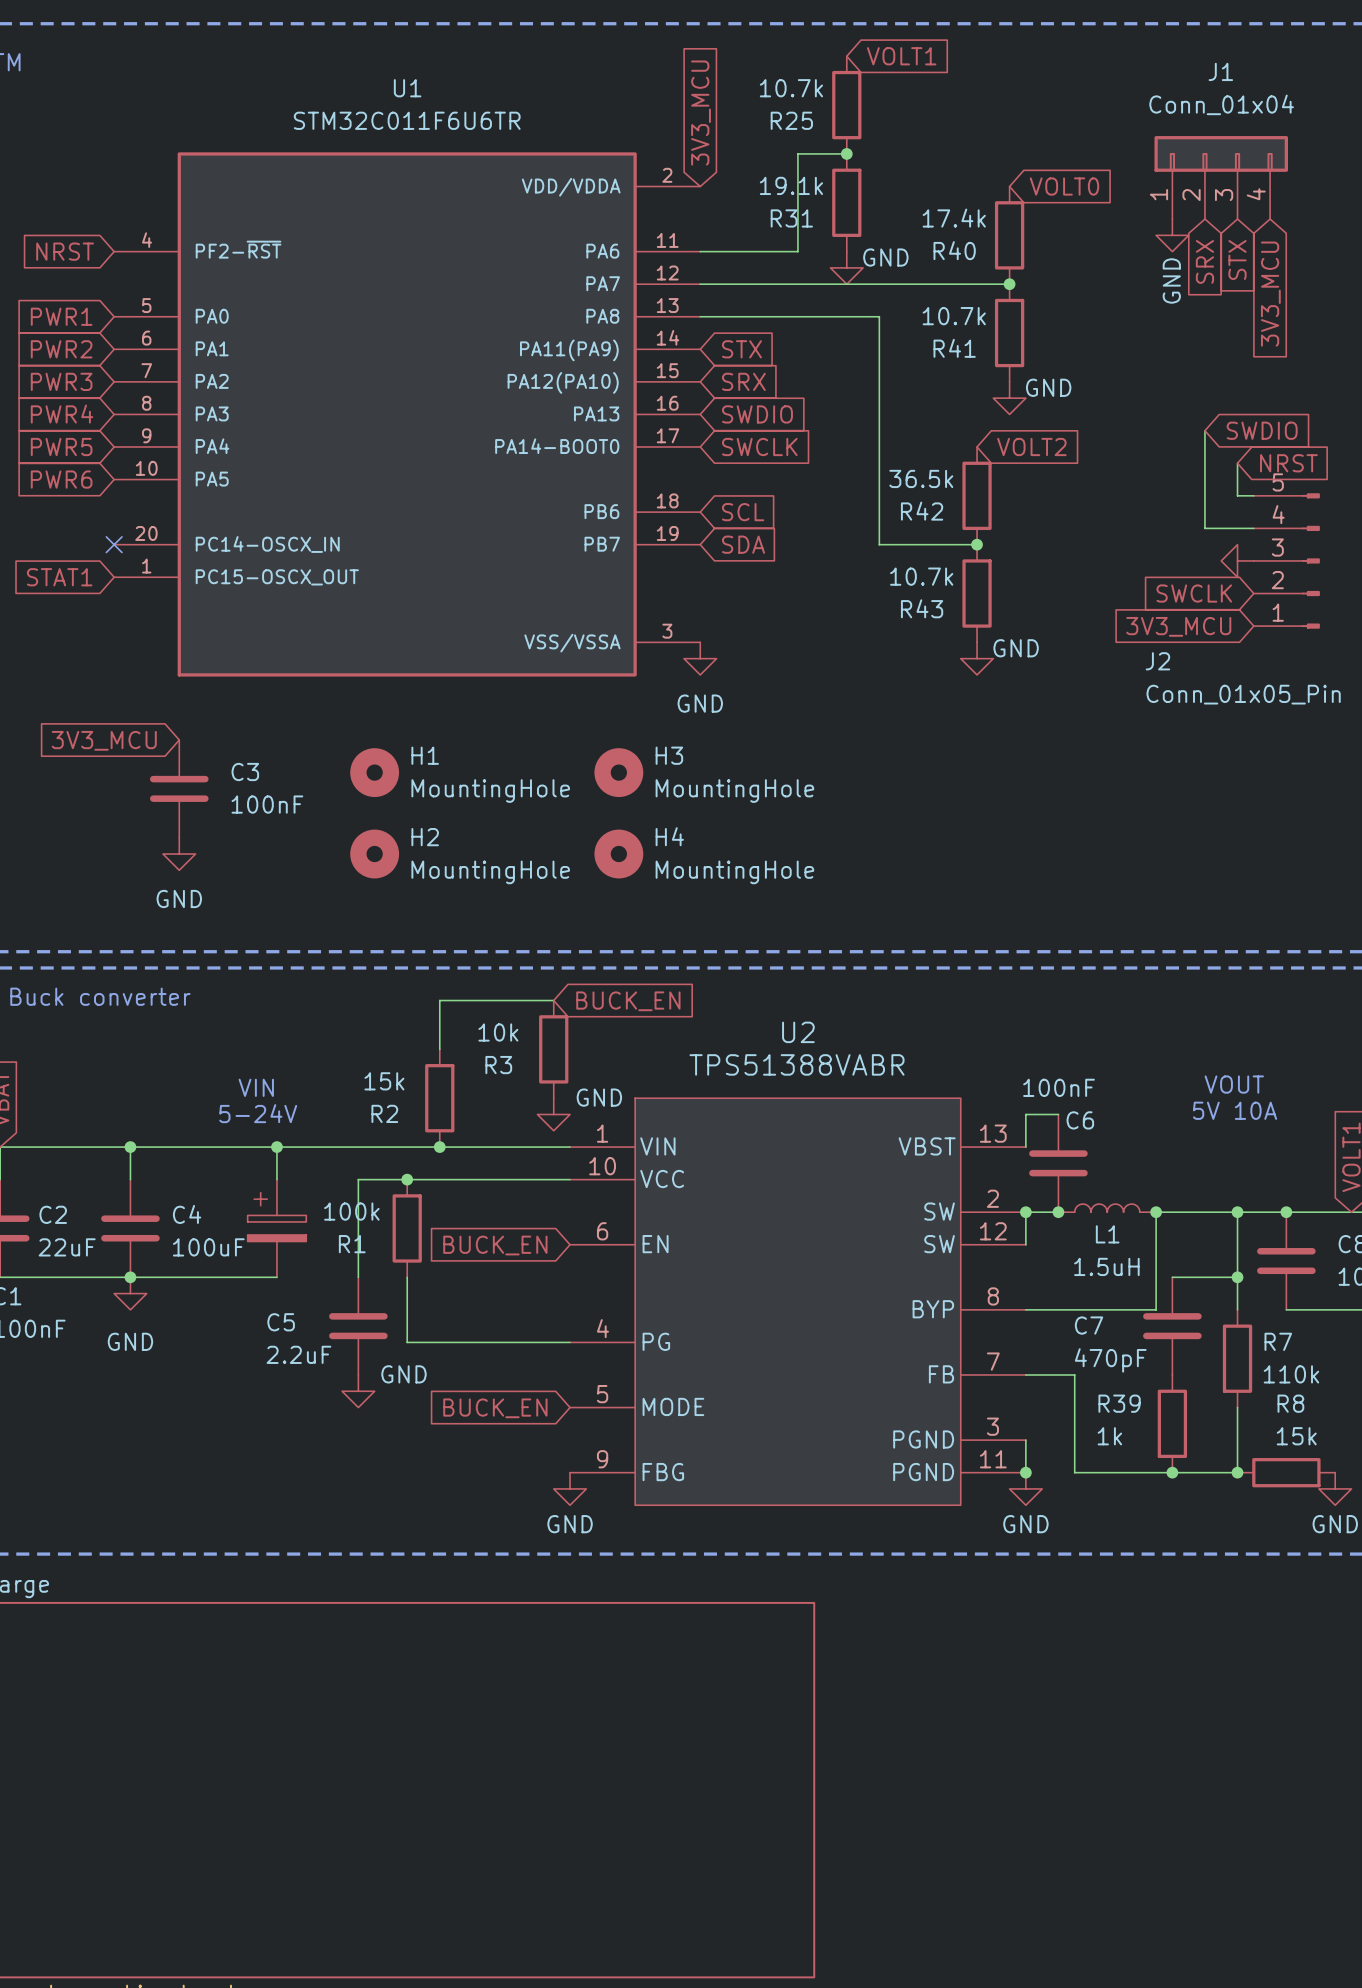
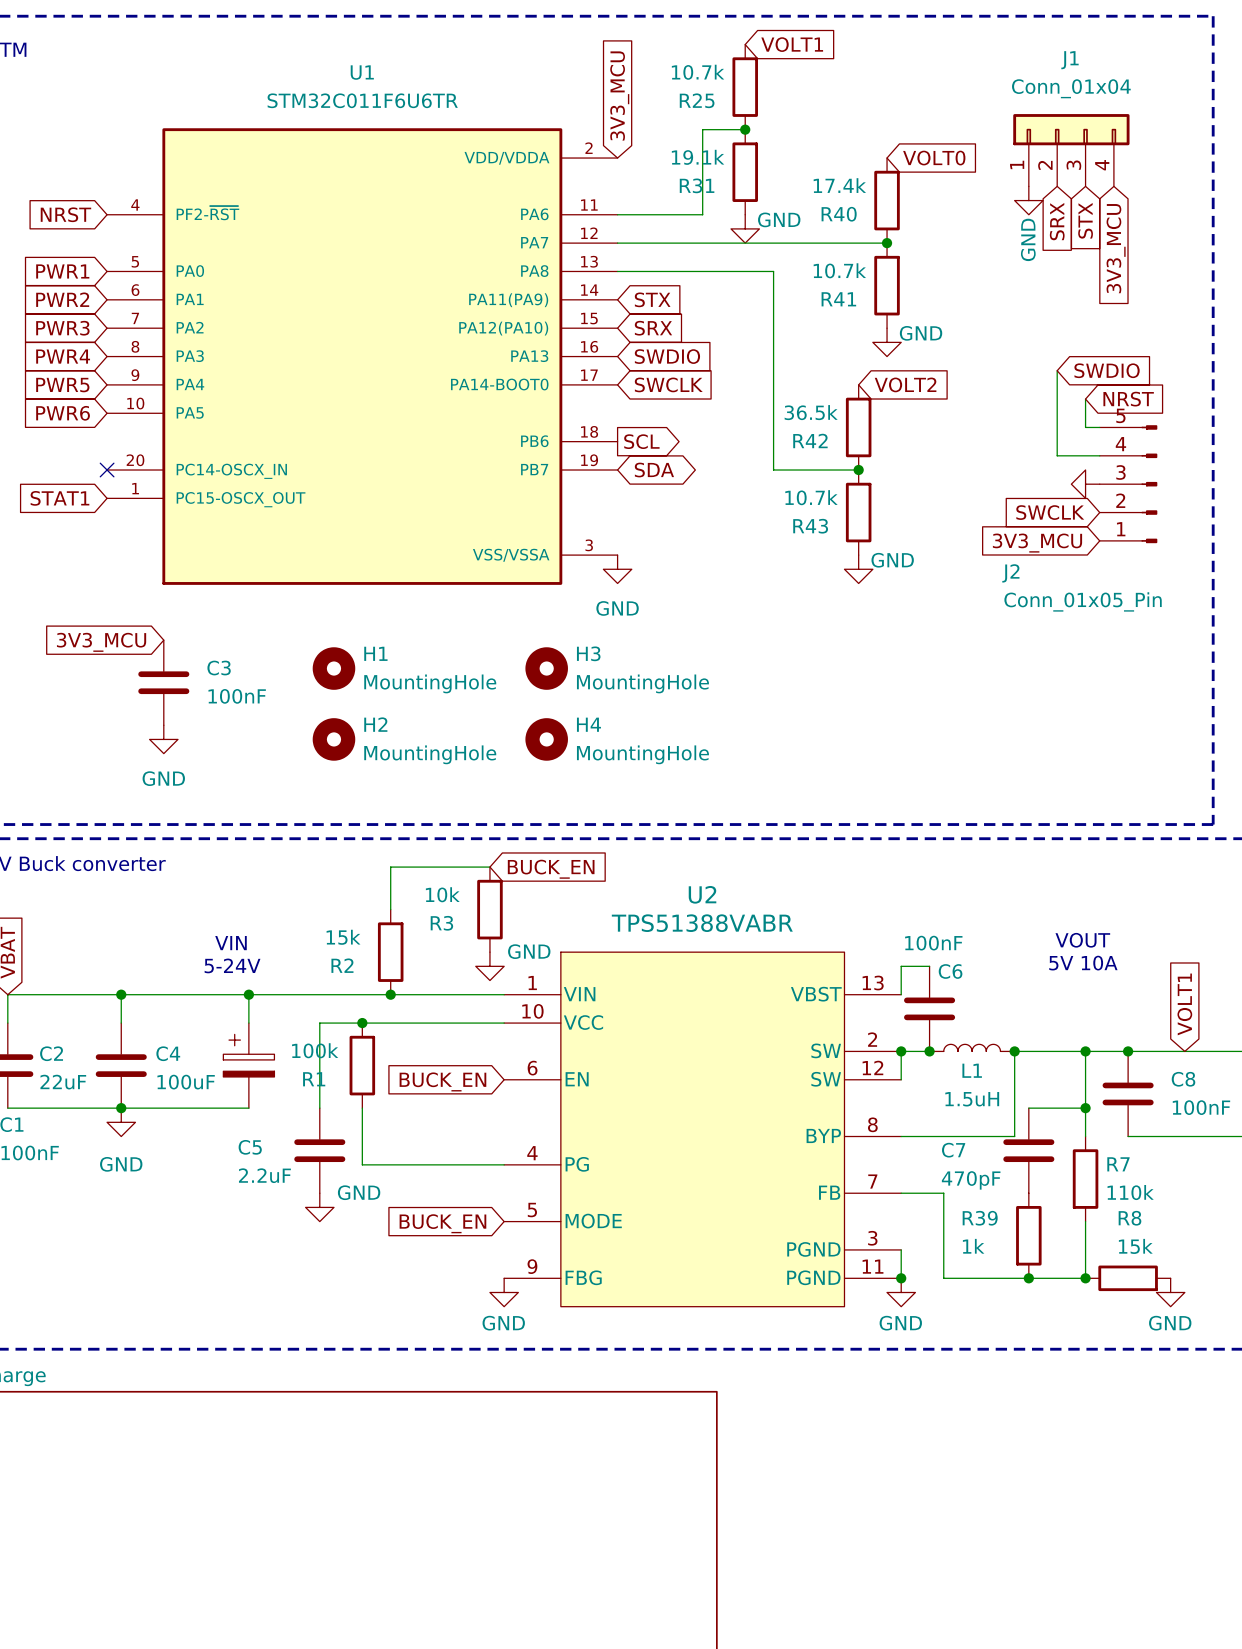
global label shape: input (743, 512) -> output (641, 441)
global label shape: input (743, 544) -> bidirectional (654, 470)

